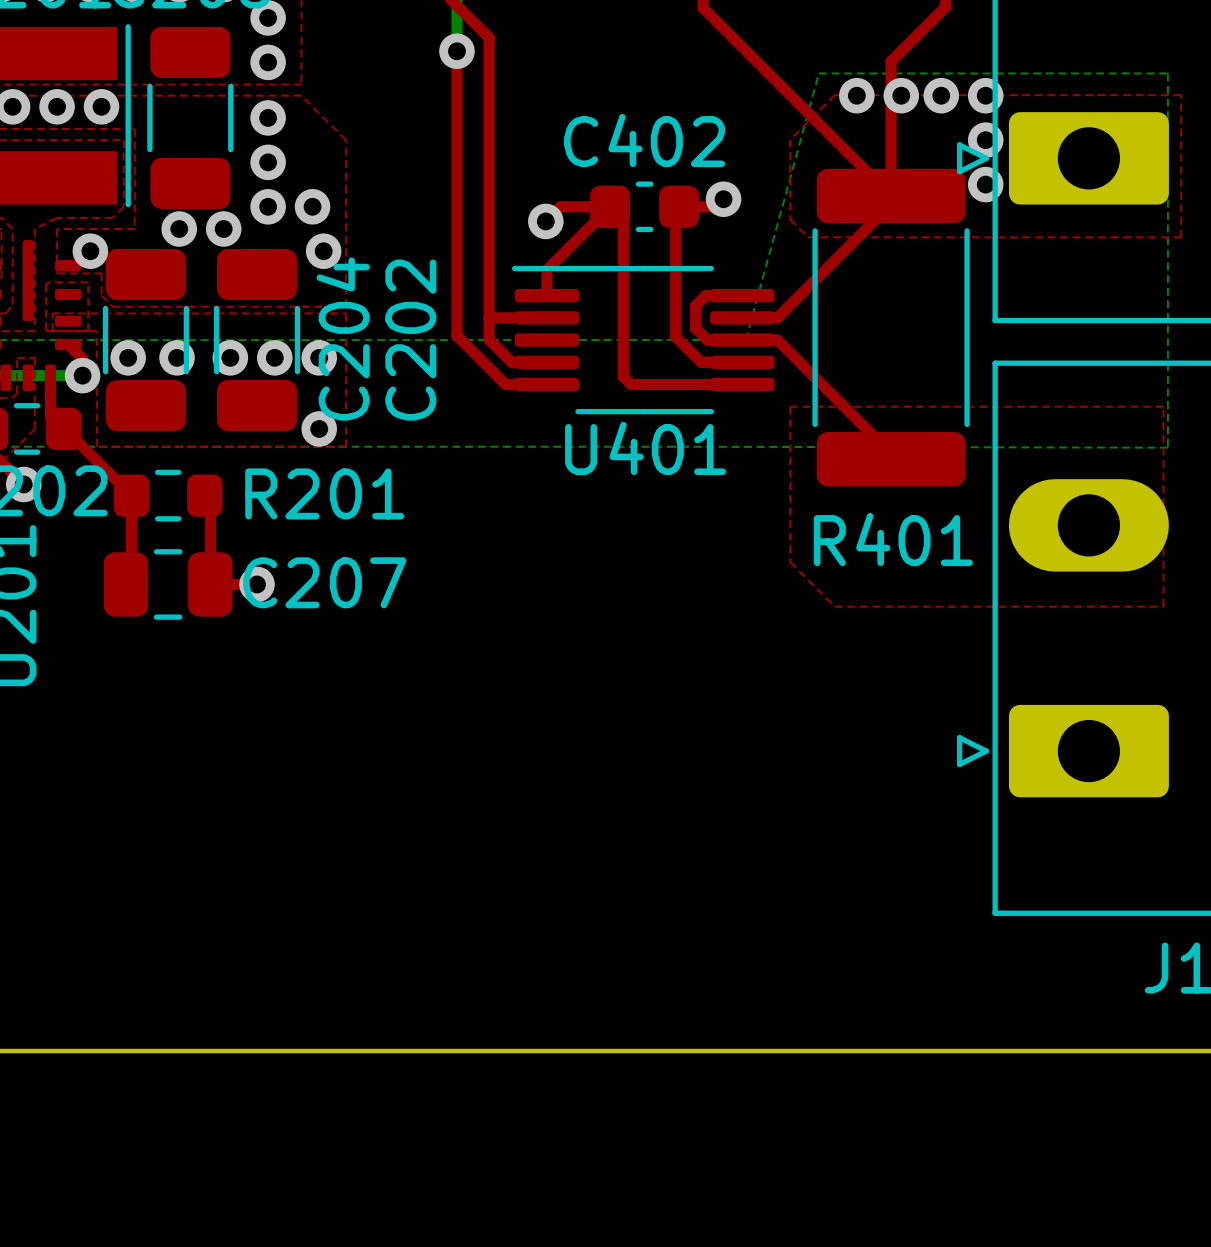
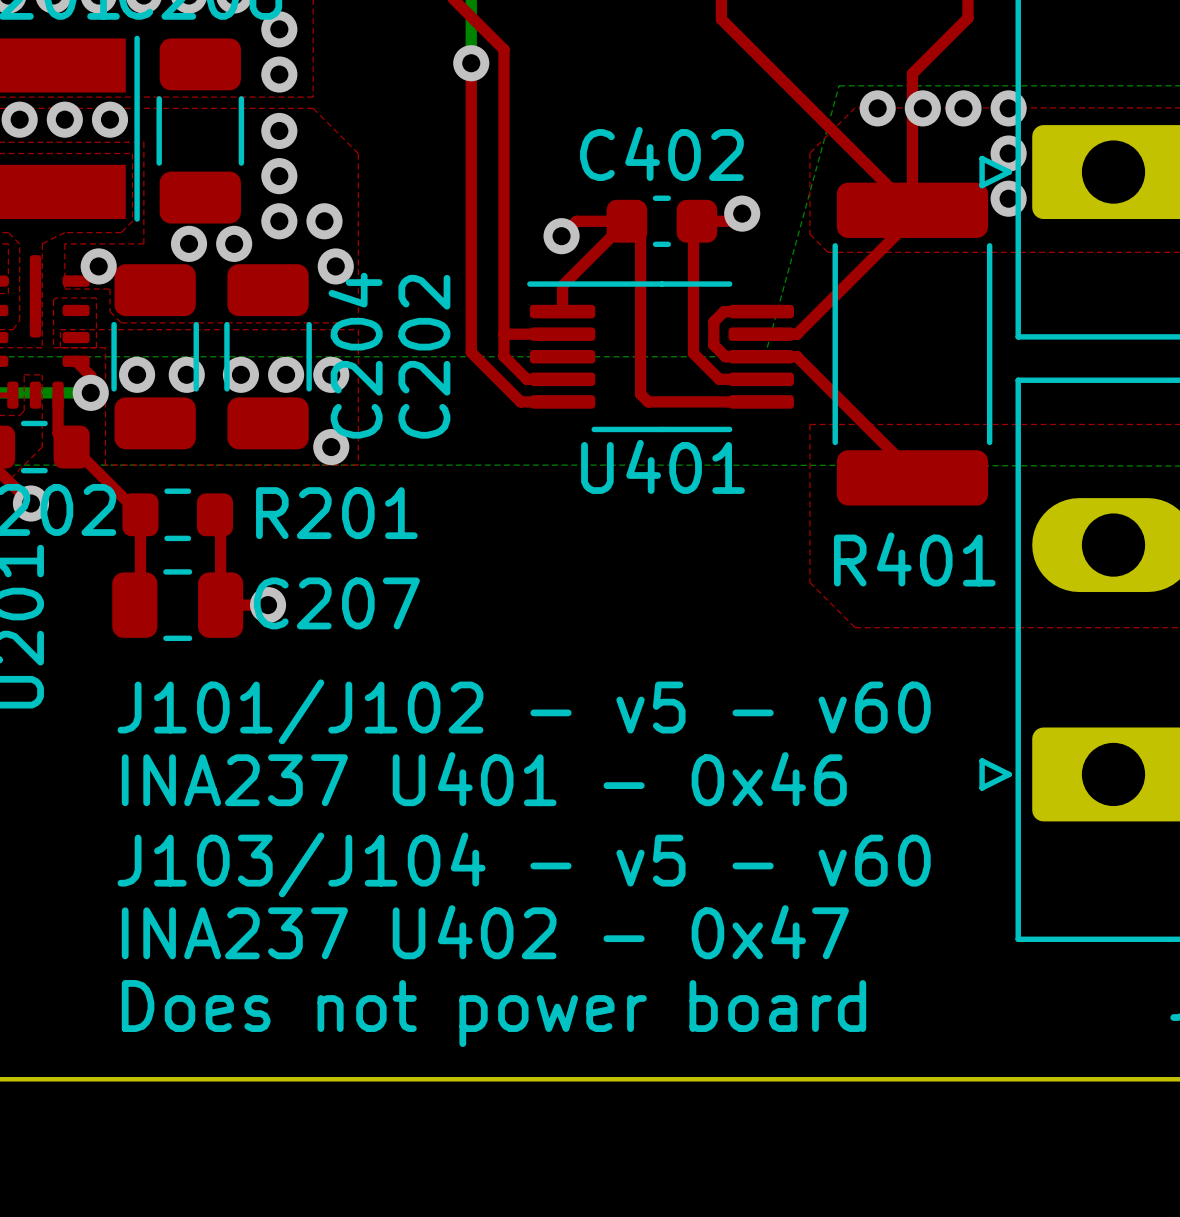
text: none -> J101/J102 - v5 - v60 (524, 711)
text: none -> INA237 U401 - 0x46 (484, 779)
text: none -> J103/J104 - v5 - v60 (524, 864)
text: none -> INA237 U402 - 0x47 (485, 932)
text: none -> Does not power board (493, 1013)

